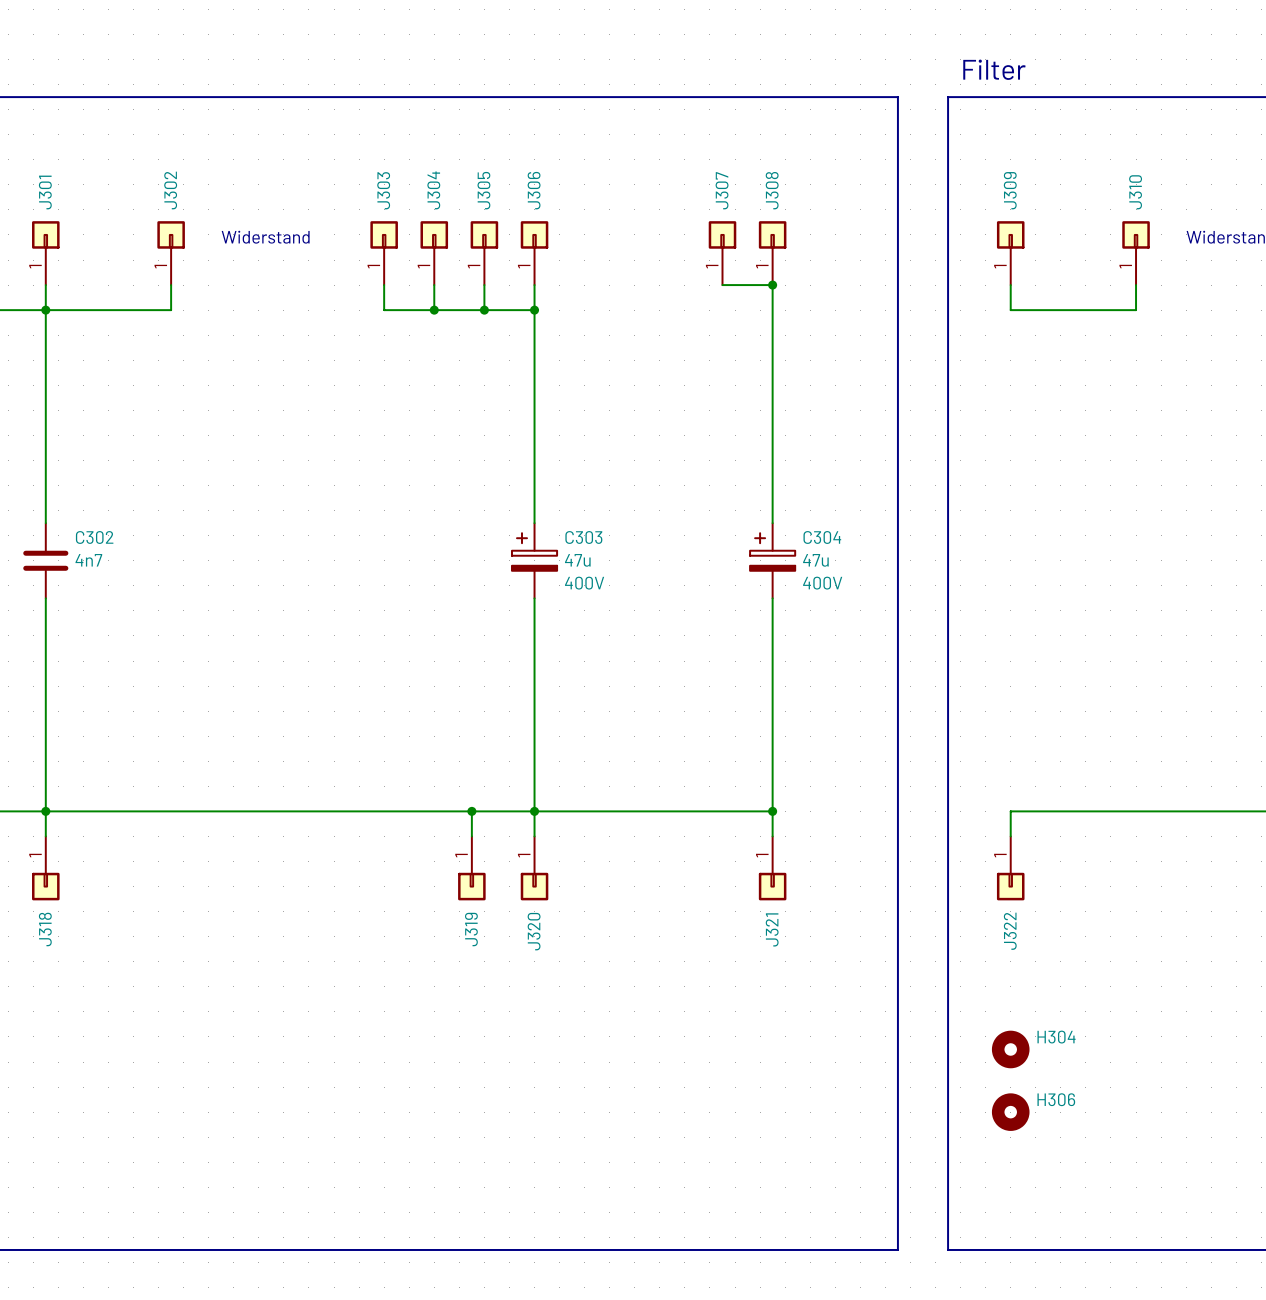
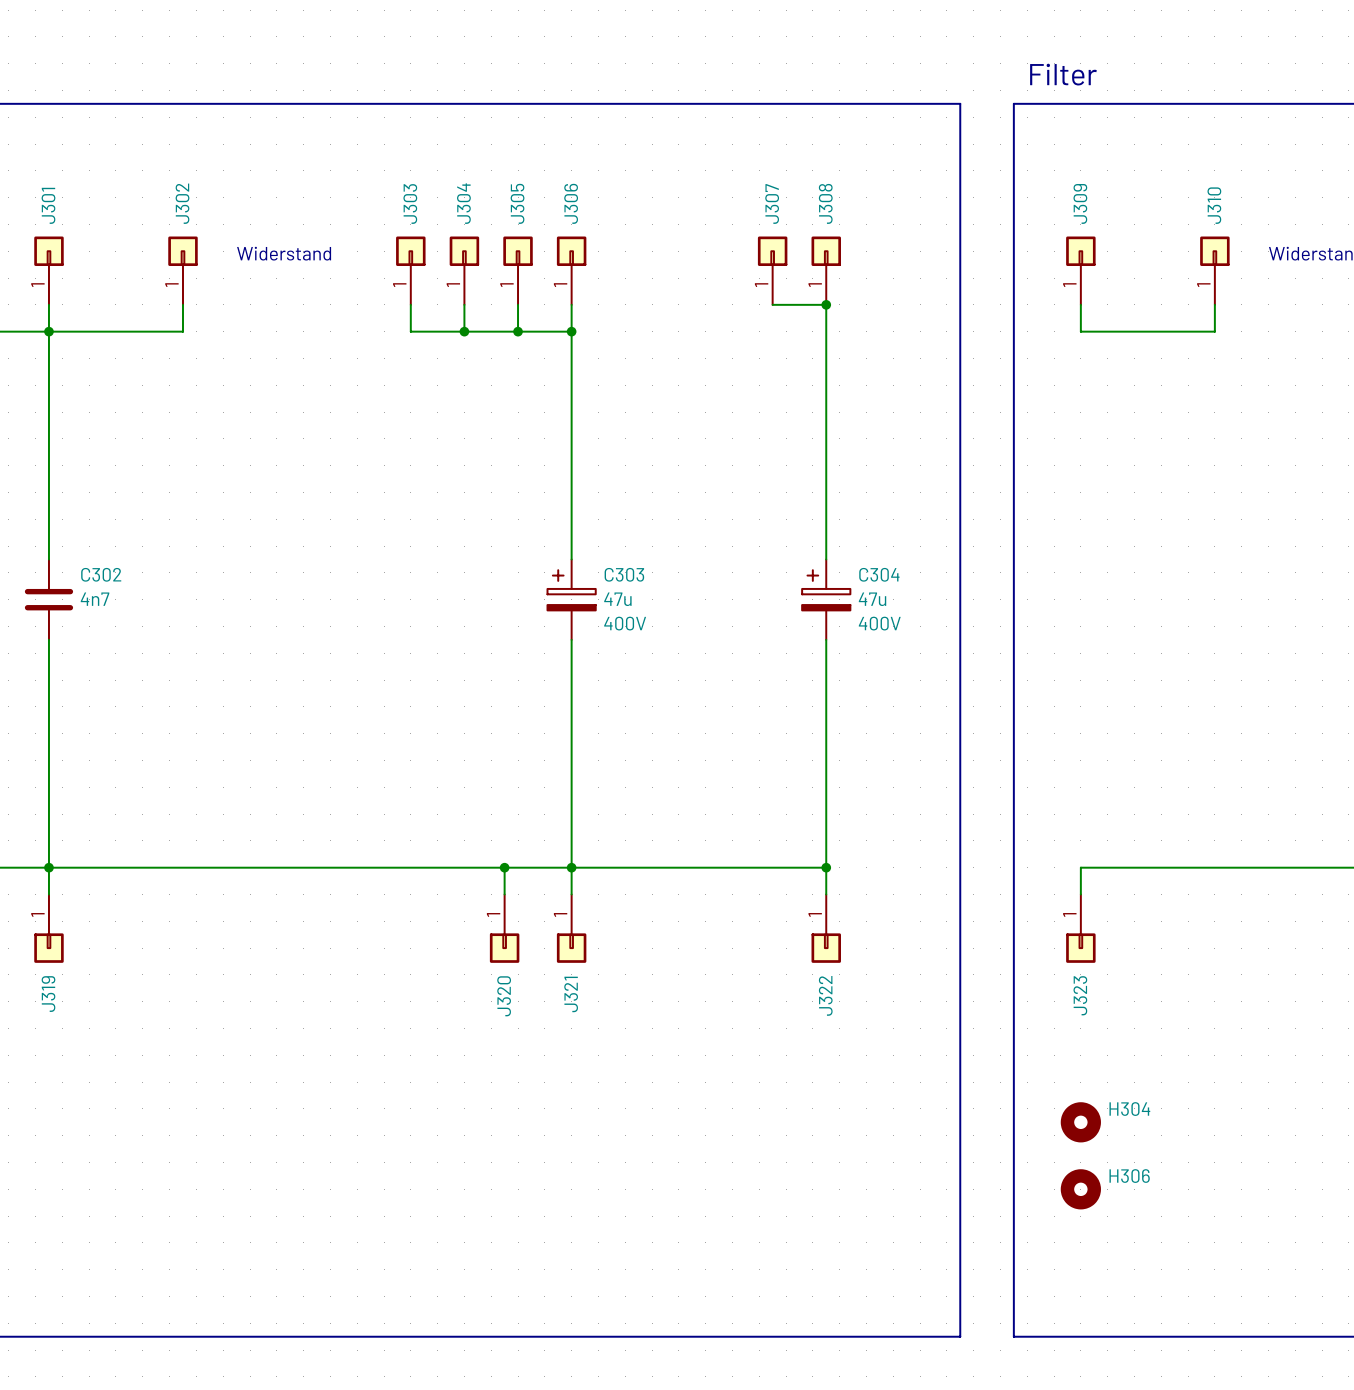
J318 name: J318 (45, 929) -> J319 (48, 994)
J319 name: J319 (471, 929) -> J320 (504, 996)
J321 name: J321 (772, 929) -> J322 (825, 995)
J320 name: J320 (534, 931) -> J321 (571, 994)
J322 name: J322 (1010, 931) -> J323 (1080, 995)

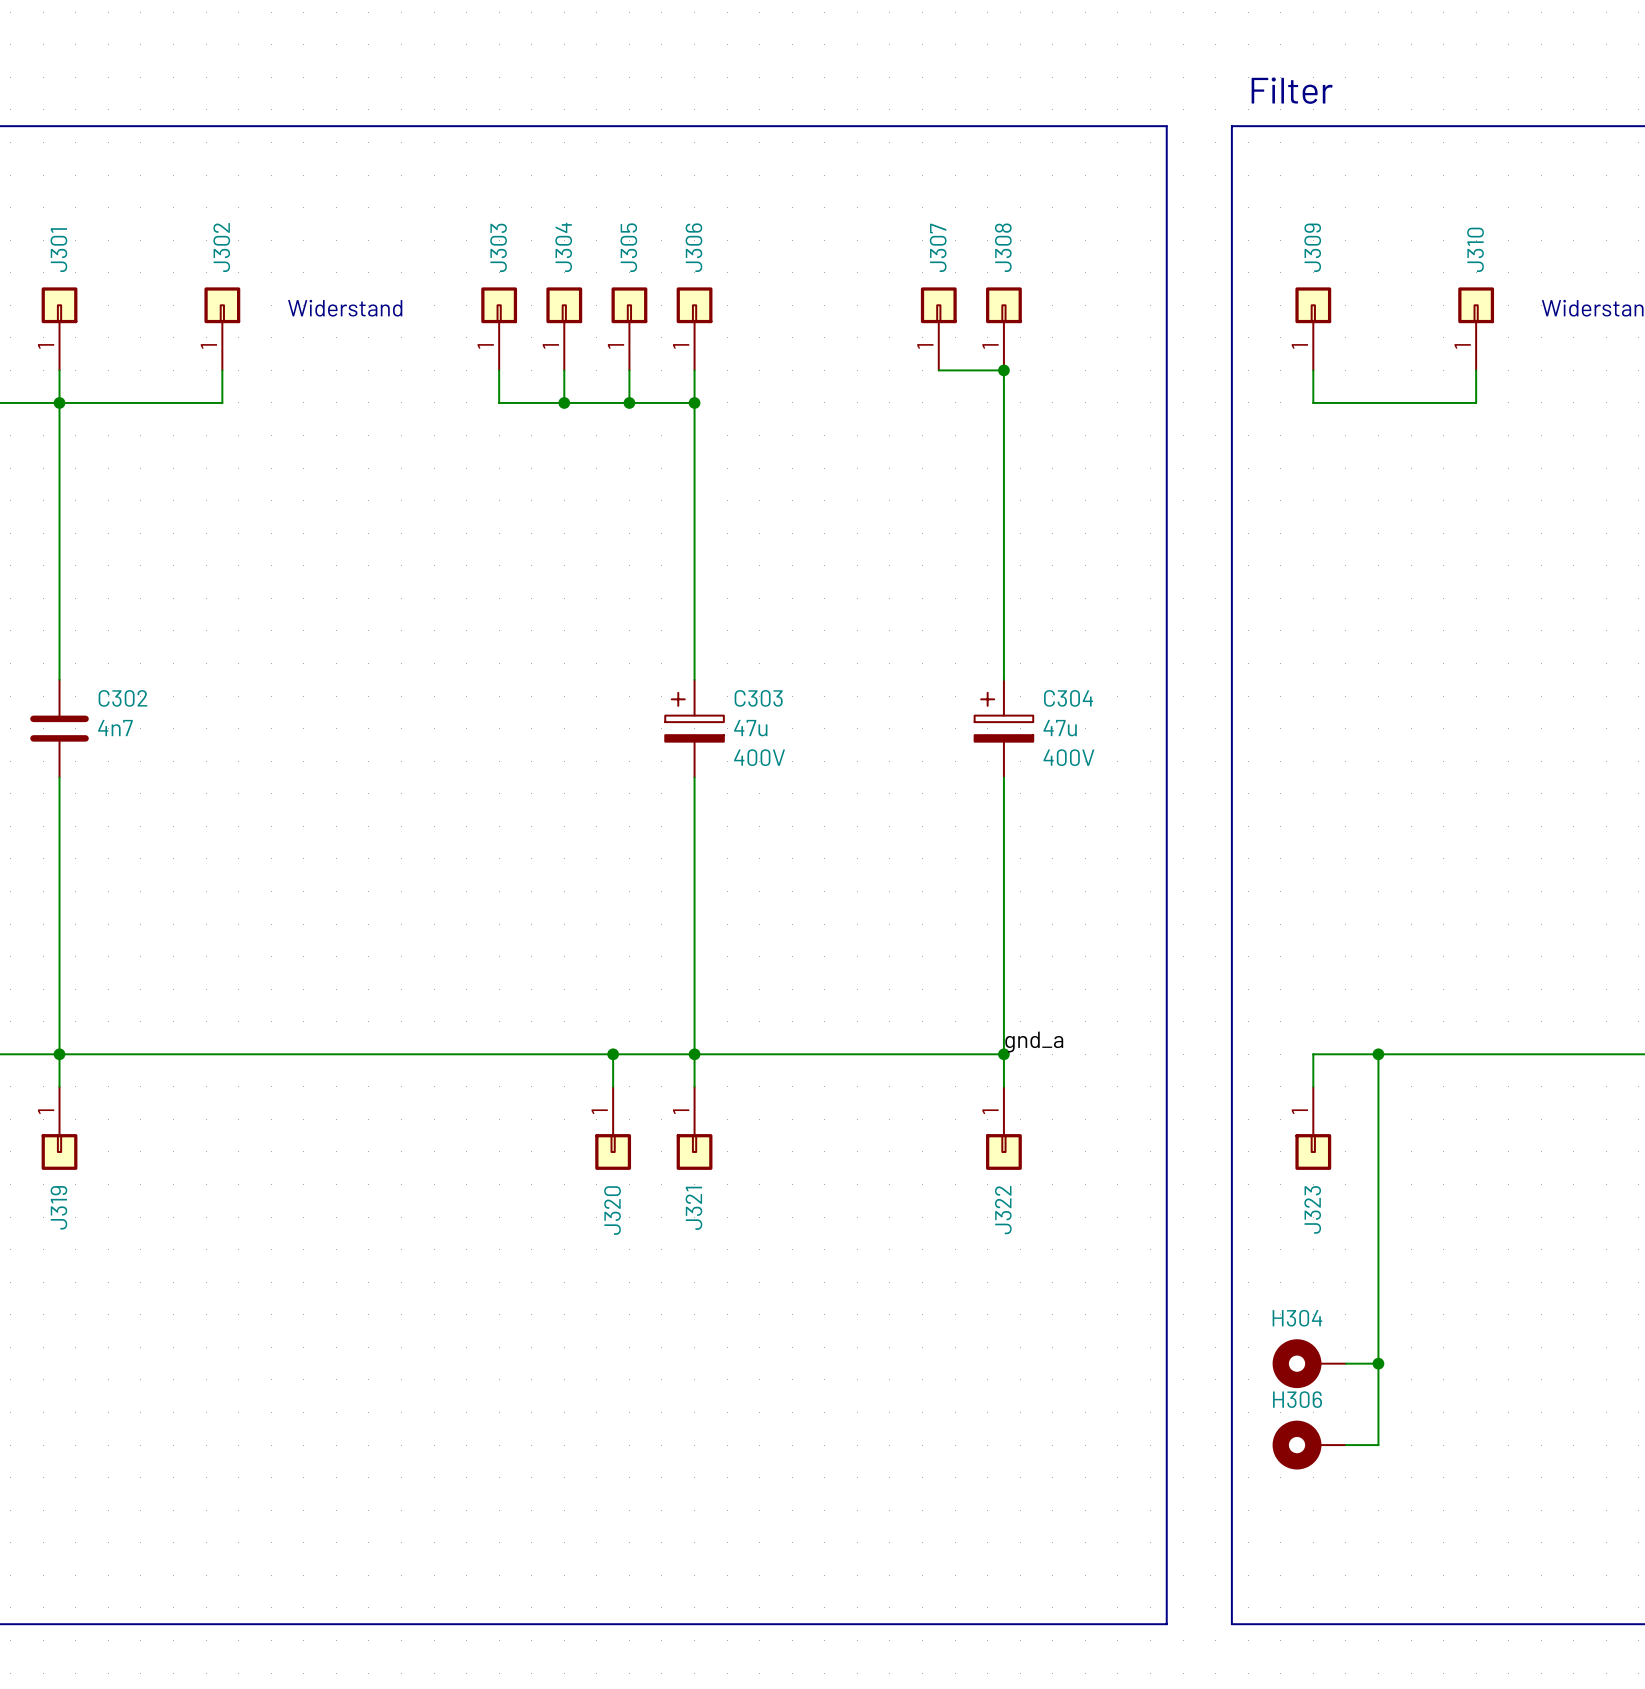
label: none -> gnd_a (1034, 1042)
wire: none -> (1378, 1054) (1378, 1445) (1345, 1445)
junction: none -> (1378, 1054)
H304 symbol: [1060, 1102, 1101, 1143] -> [1272, 1339, 1346, 1389]
H304 name position: H304 (1129, 1109) -> H304 (1297, 1318)
wire: none -> (1345, 1363) (1378, 1363)
junction: none -> (1378, 1363)
H306 symbol: [1060, 1169, 1101, 1210] -> [1272, 1420, 1346, 1470]
H306 name position: H306 (1129, 1176) -> H306 (1297, 1399)

